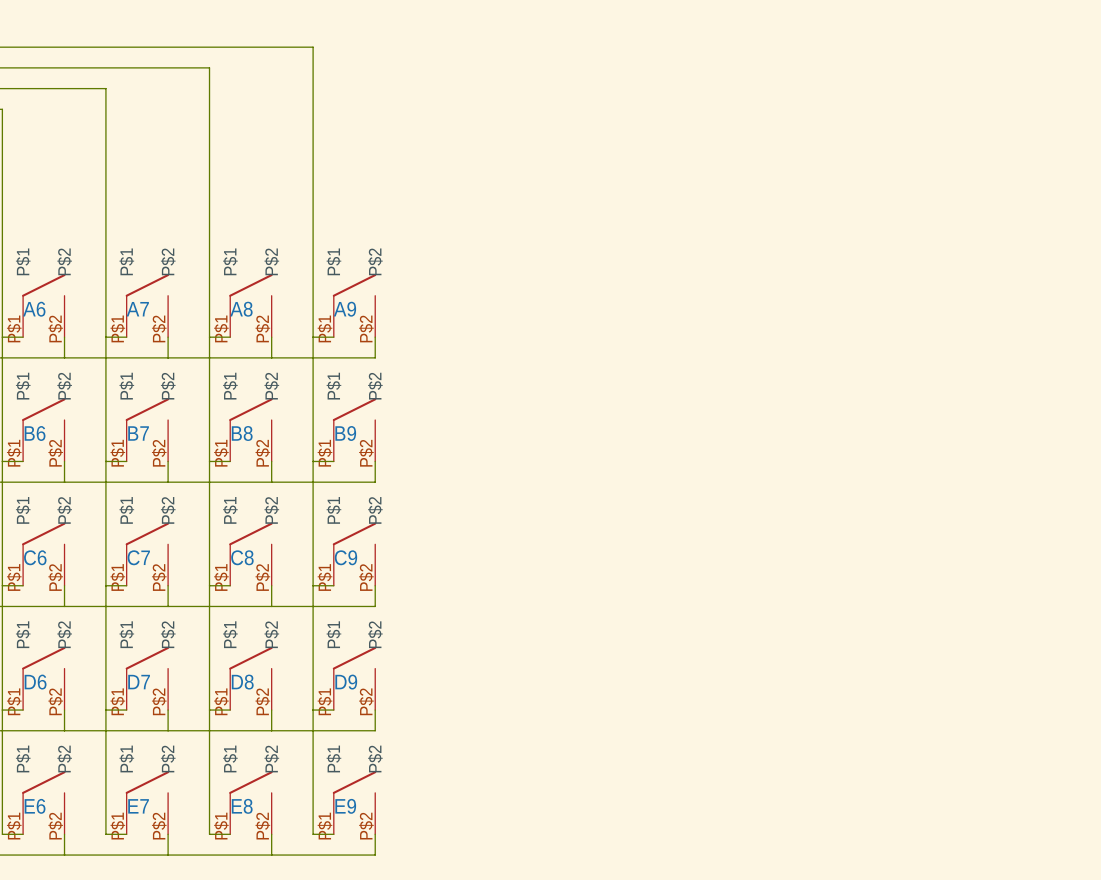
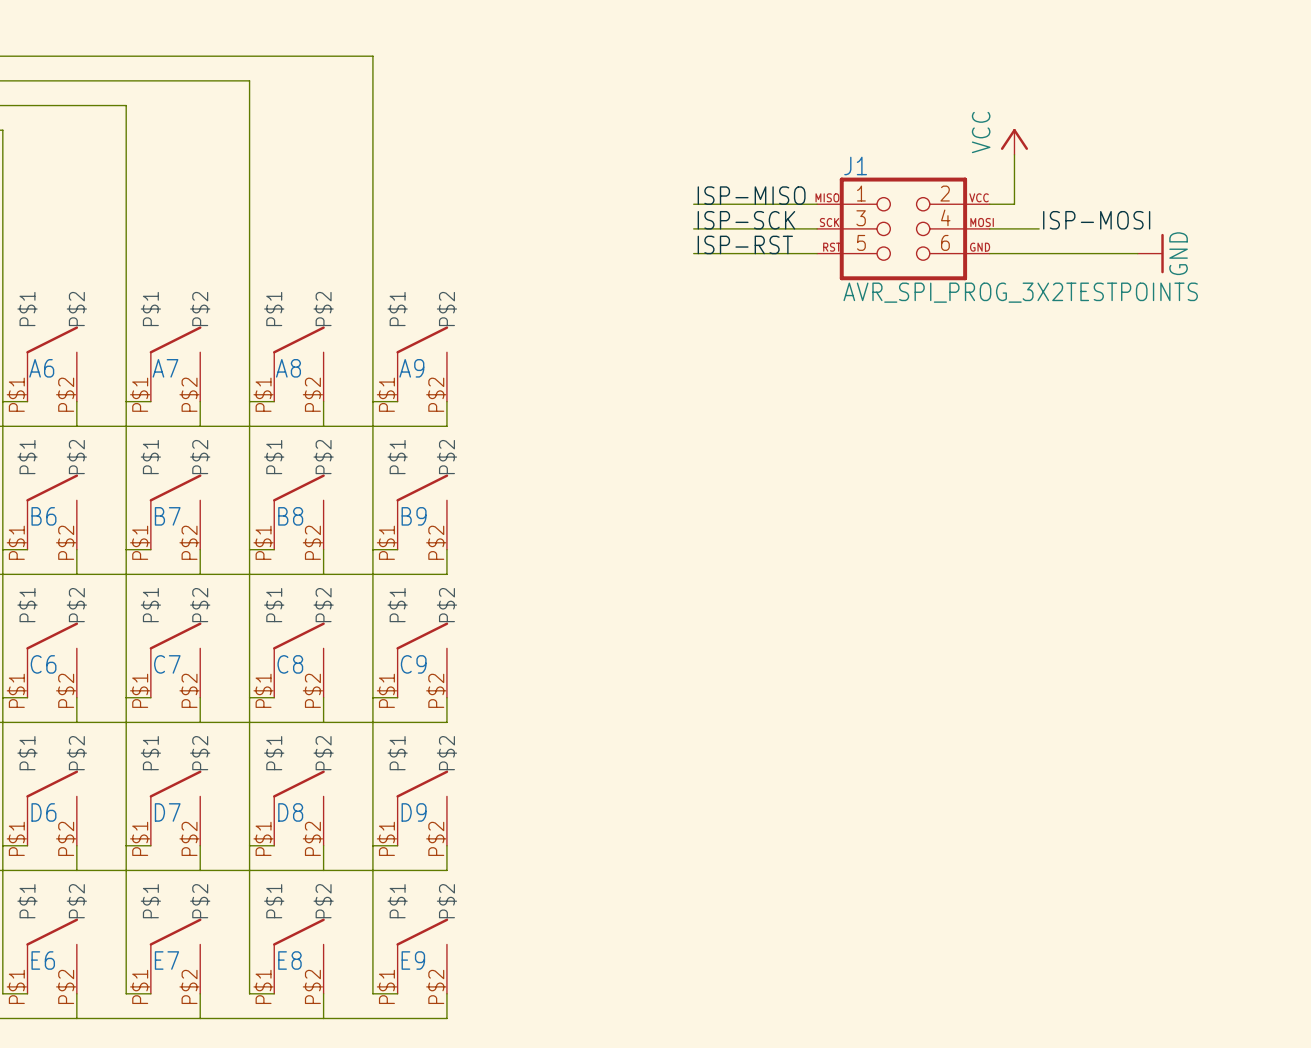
power symbol: none -> VCC (1014, 141)
wire: none -> (1014, 154) (1014, 204) (989, 204)
label: none -> ISP-MISO (751, 195)
wire: none -> (693, 204) (817, 204)
label: none -> ISP-SCK (746, 220)
label: none -> ISP-MOSI (1096, 220)
wire: none -> (693, 228) (817, 228)
J1: none -> AVR_SPI_PROG_3X2TESTPOINTS (903, 228)
wire: none -> (989, 228) (1039, 228)
label: none -> ISP-RST (745, 244)
wire: none -> (693, 253) (817, 253)
wire: none -> (989, 253) (1137, 253)
power symbol: none -> GND (1150, 253)

